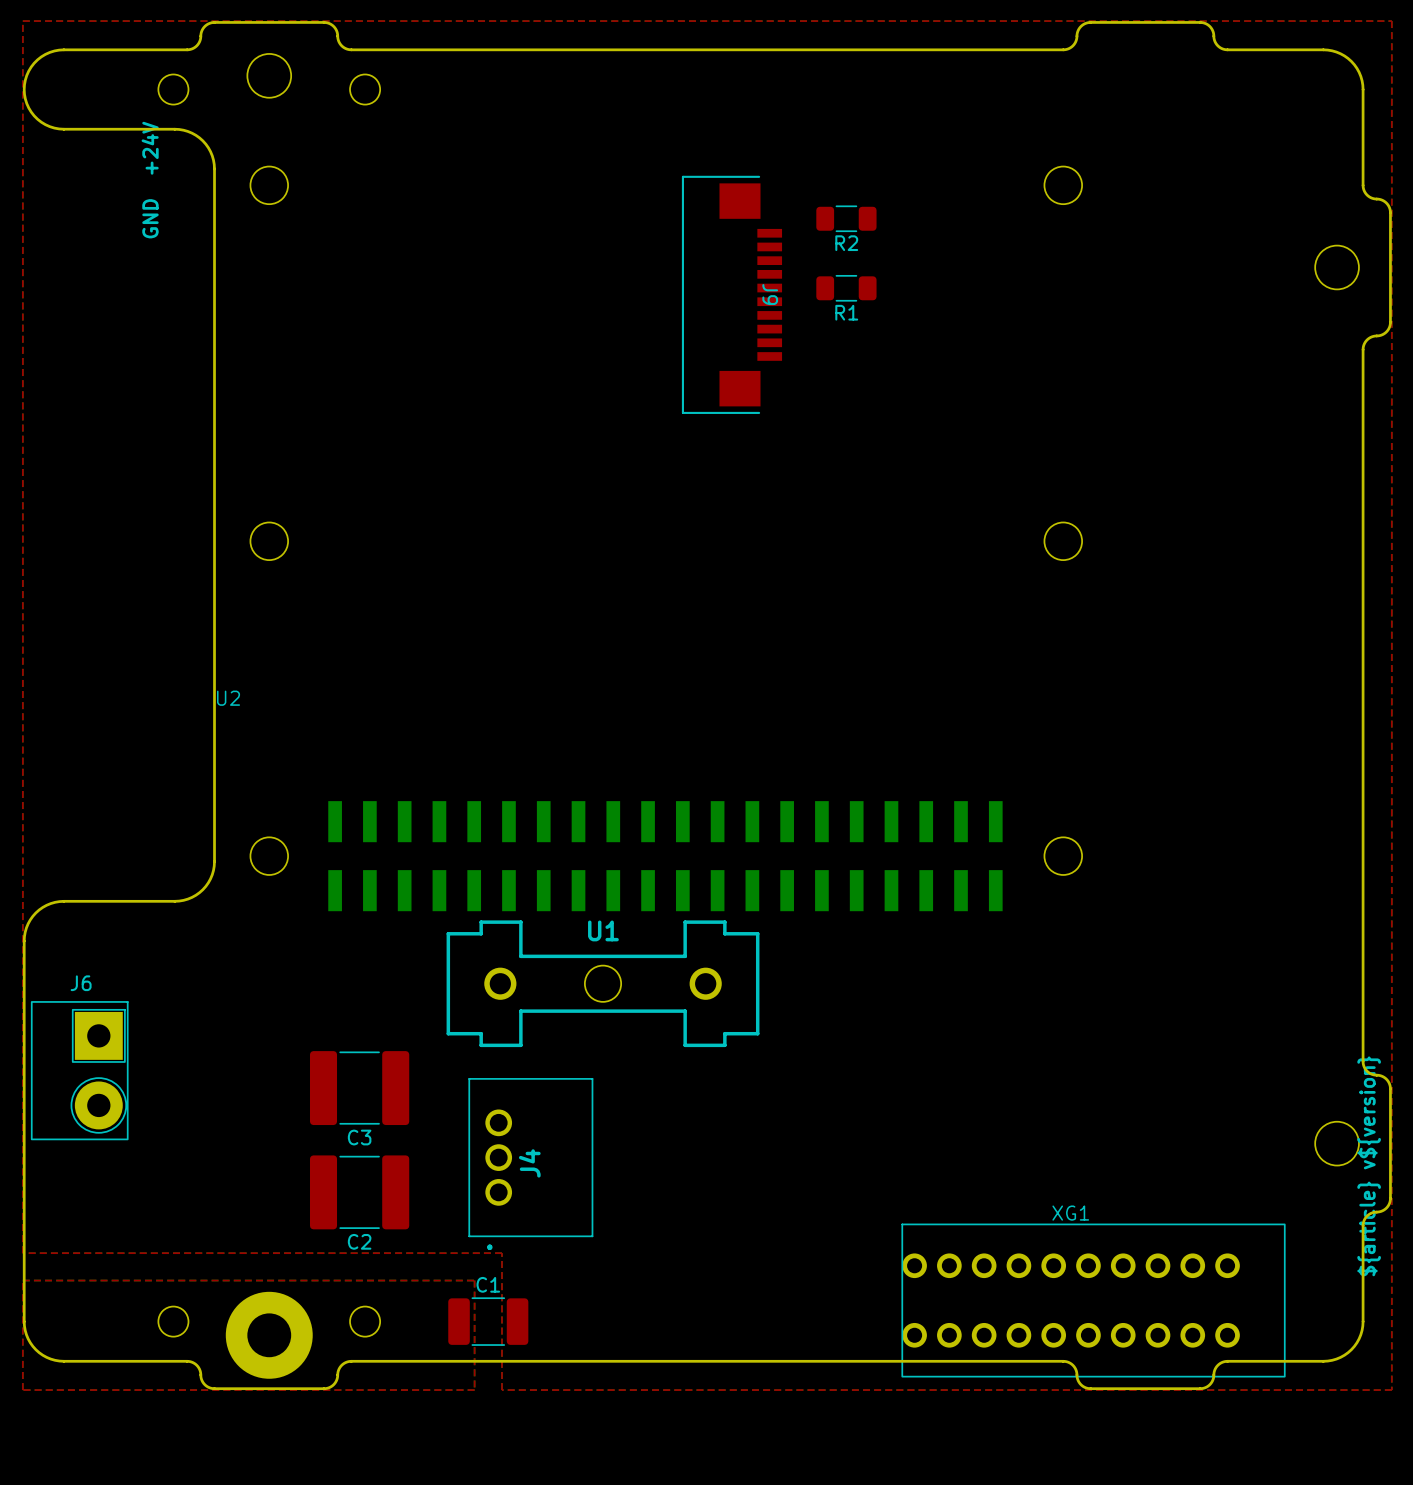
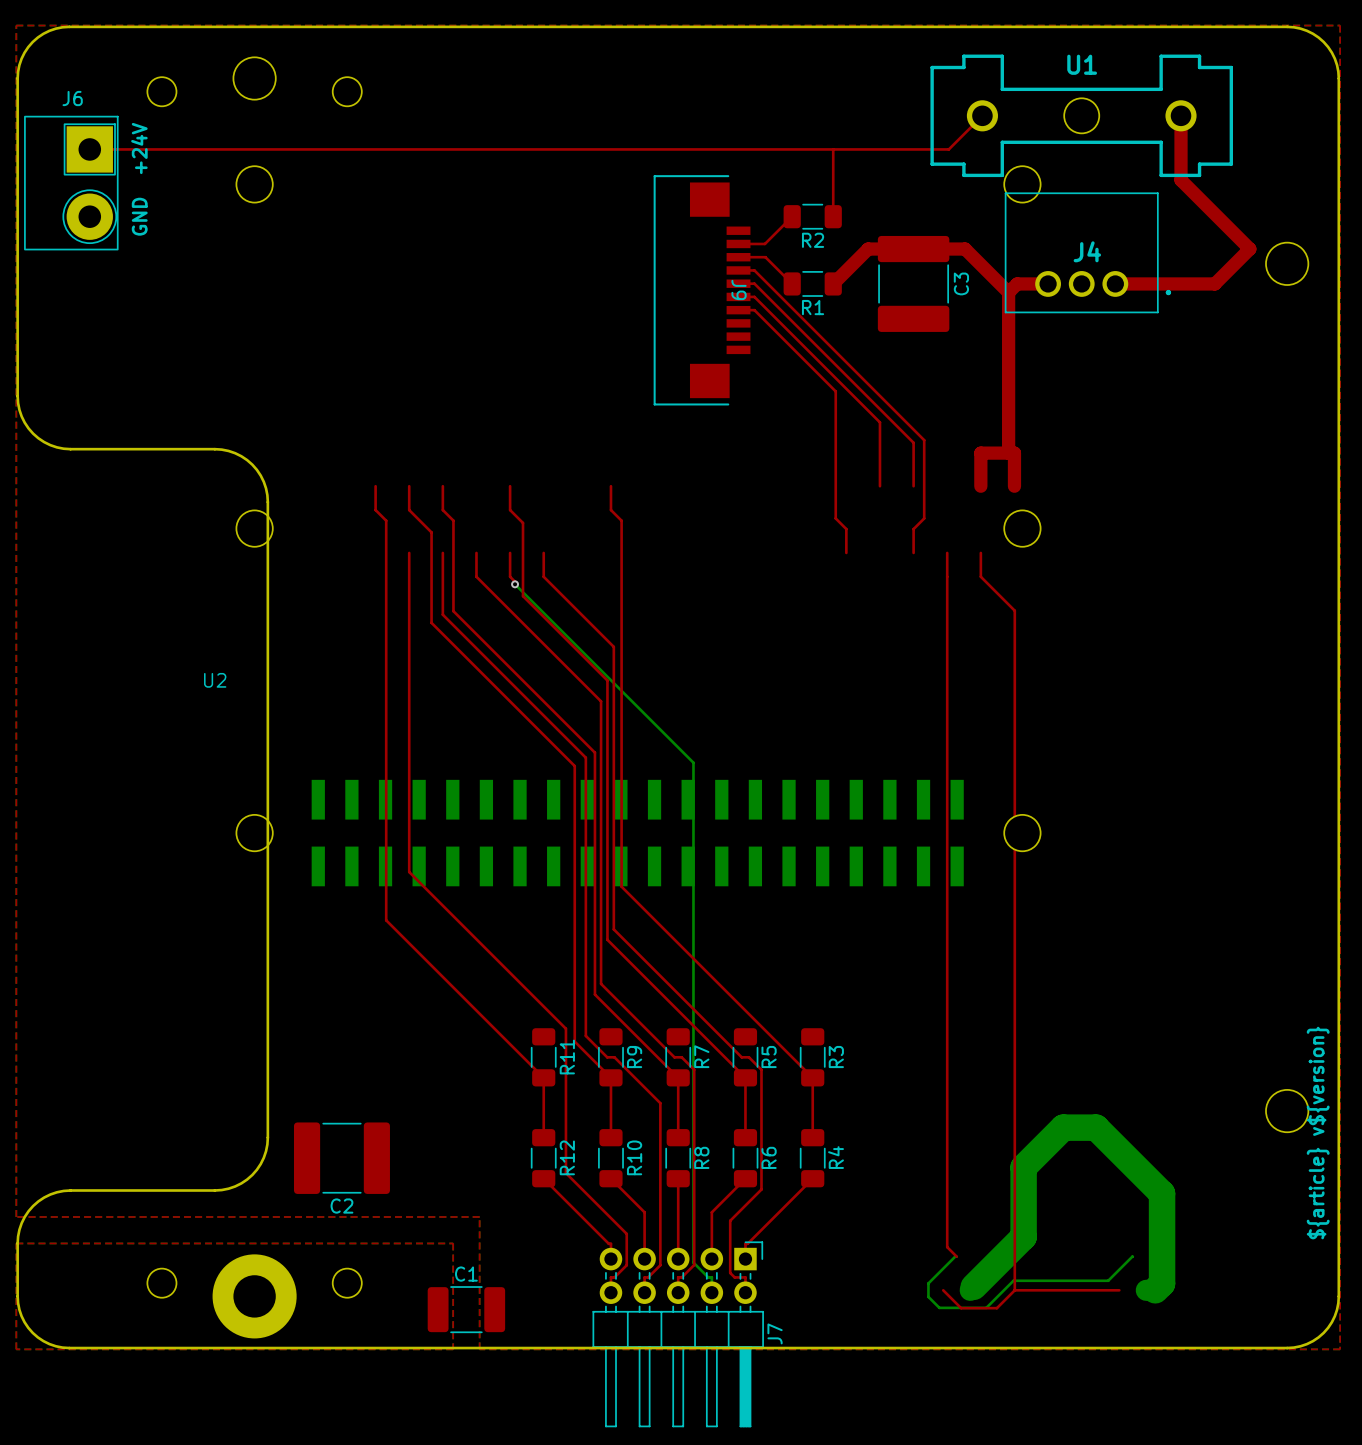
board edge: (214, 22) (204, 26) (198, 43) (190, 49) (63, 49) (49, 52) (41, 56) (31, 66) (24, 84) (25, 99) (31, 112) (37, 119) (49, 126) (63, 129) (183, 130) (202, 140) (213, 160) (214, 861) (208, 882) (199, 892) (187, 899) (174, 901) (59, 901) (42, 907) (28, 923) (24, 941) (24, 1280) -> (201, 26) (62, 27) (49, 30) (37, 37) (24, 52) (19, 65) (17, 78) (17, 396) (19, 409) (24, 422) (33, 433) (50, 445) (70, 449) (214, 449) (228, 450) (241, 456) (252, 464) (260, 475) (266, 488) (267, 502) (267, 1144) (260, 1164) (252, 1174) (241, 1183) (228, 1188) (214, 1190) (70, 1190) (50, 1194) (38, 1201) (24, 1216) (19, 1229) (17, 1243)
board edge: (324, 22) (334, 27) (341, 45) (351, 49) (1063, 49) (1072, 45) (1079, 27) (1090, 22) -> (307, 26) (1048, 26)
board edge: (1200, 22) (1209, 26) (1215, 43) (1224, 49) (1327, 50) (1340, 53) (1351, 61) (1359, 72) (1362, 85) (1363, 188) (1369, 196) (1386, 203) (1390, 212) -> (1154, 26) (1293, 27) (1312, 33) (1323, 41) (1331, 52) (1338, 71) (1338, 210)
top track: none -> (982, 115) (948, 149) (89, 149)
top track: none -> (1181, 115) (1181, 180) (1249, 249) (1214, 283) (1115, 283)
top track: none -> (833, 149) (833, 216)
top track: none -> (792, 216) (764, 243) (738, 243)
top track: none -> (738, 257) (765, 257) (792, 283)
top track: none -> (738, 270) (754, 270) (924, 440) (924, 518) (913, 529) (913, 552)
top track: none -> (738, 283) (754, 283) (913, 442) (913, 486)
top track: none -> (833, 283) (868, 249) (965, 249) (1008, 292)
top track: none -> (1048, 283) (1017, 283) (1008, 292)
top track: none -> (1008, 292) (1008, 453)
top track: none -> (738, 296) (754, 296) (879, 422) (879, 486)
top track: none -> (738, 310) (754, 310) (835, 391) (835, 518) (846, 529) (846, 552)
board edge: (1390, 322) (1385, 332) (1367, 339) (1363, 349) (1363, 1061) (1367, 1071) (1385, 1078) (1390, 1088) -> (1338, 316) (1338, 1058)
top track: none -> (375, 486) (375, 510) (386, 520) (386, 920) (543, 1077) (543, 1137)
top track: none -> (409, 486) (409, 510) (431, 532) (431, 622) (574, 766) (574, 1041) (610, 1077) (610, 1137)
top track: none -> (442, 486) (442, 510) (453, 520) (453, 611) (594, 752) (594, 994) (678, 1077) (678, 1137)
top track: none -> (510, 486) (510, 510) (523, 522) (523, 596) (607, 680) (607, 939) (745, 1077) (745, 1137)
top track: none -> (610, 486) (610, 510) (621, 520) (621, 886) (812, 1077) (812, 1137)
top track: none -> (980, 486) (980, 453) (1014, 453) (1014, 486)
top track: none -> (409, 552) (409, 872) (565, 1028) (565, 1173) (626, 1233) (626, 1265) (614, 1277) (610, 1277) (610, 1292)
top track: none -> (442, 552) (442, 614) (585, 757) (585, 1035) (607, 1057) (614, 1057) (660, 1103) (660, 1265) (648, 1277) (644, 1277) (644, 1292)
top track: none -> (476, 552) (476, 576) (601, 701) (601, 983) (674, 1057) (681, 1057) (694, 1069) (694, 1265) (681, 1277) (678, 1277) (678, 1292)
top track: none -> (510, 552) (510, 576) (515, 584)
top track: none -> (543, 552) (543, 576) (613, 646) (613, 929) (741, 1057) (748, 1057) (761, 1069) (761, 1189) (730, 1220) (730, 1272) (734, 1277) (745, 1277) (745, 1292)
top track: none -> (947, 552) (947, 1247) (956, 1256)
top track: none -> (980, 552) (980, 576) (1014, 610) (1014, 1290)
bottom track: none -> (515, 584) (693, 762) (693, 1262) (708, 1277) (711, 1277) (711, 1292)
via: none -> (515, 584)
U1 position: (603, 983) -> (1081, 115)
J6 position: (79, 1070) -> (71, 183)
C3 rotation: 0° (359, 1088) -> 90° clockwise (913, 283)
C3 position: (359, 1088) -> (913, 283)
R11: none -> (543, 1057)
R9: none -> (610, 1057)
R7: none -> (678, 1057)
R5: none -> (745, 1057)
R3: none -> (812, 1057)
C3 name position: C3 (359, 1137) -> C3 (961, 283)
J4 rotation: 0° (530, 1164) -> 90° counterclockwise (1088, 252)
J4 position: (530, 1164) -> (1088, 252)
R12: none -> (543, 1158)
R10: none -> (610, 1158)
R8: none -> (678, 1158)
R6: none -> (745, 1158)
R4: none -> (812, 1158)
board edge: (1390, 1198) (1386, 1208) (1369, 1214) (1363, 1222) (1362, 1326) (1359, 1338) (1351, 1349) (1340, 1357) (1327, 1361) (1224, 1361) (1215, 1367) (1209, 1384) (1200, 1388) -> (1338, 1164) (1338, 1303) (1331, 1322) (1323, 1332) (1306, 1344) (1293, 1347) (1154, 1348)
top track: none -> (543, 1178) (610, 1243) (610, 1259)
top track: none -> (610, 1178) (644, 1212) (644, 1259)
top track: none -> (678, 1178) (678, 1259)
top track: none -> (745, 1178) (711, 1212) (711, 1259)
top track: none -> (812, 1178) (745, 1243) (745, 1259)
bottom track: none -> (956, 1256) (928, 1283) (928, 1296) (939, 1307) (986, 1307) (1013, 1280) (1108, 1280) (1132, 1256)
XG1: (1093, 1300) -> none
board edge: (24, 1321) (30, 1342) (39, 1352) (50, 1359) (63, 1361) (190, 1361) (198, 1367) (204, 1384) (214, 1388) -> (17, 1283) (18, 1303) (24, 1322) (32, 1332) (49, 1344) (69, 1348) (201, 1348)
C1 position: (488, 1321) -> (466, 1309)
top track: none -> (943, 1290) (961, 1308) (996, 1308) (1014, 1290)
bottom track: none -> (970, 1290) (1023, 1236) (1023, 1167) (1063, 1127) (1096, 1127) (1162, 1193) (1162, 1283) (1155, 1290) (1146, 1290)
top track: none -> (1014, 1290) (1119, 1290)
J7: none -> (678, 1334)
board edge: (324, 1388) (334, 1383) (341, 1365) (351, 1361) (1063, 1361) (1073, 1366) (1080, 1384) (1090, 1388) -> (307, 1348) (1048, 1348)

